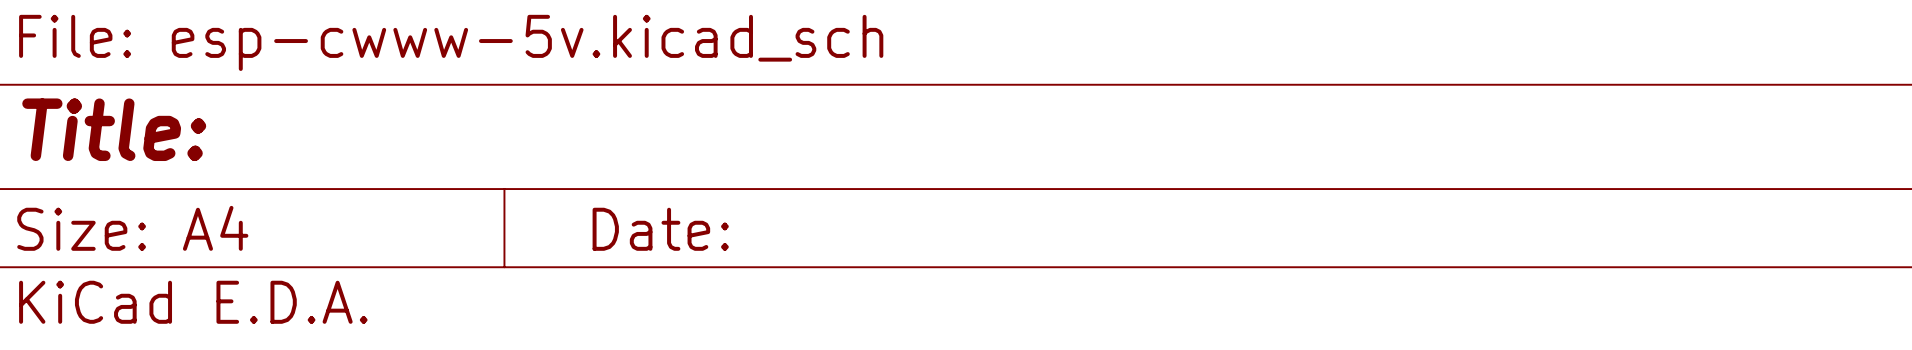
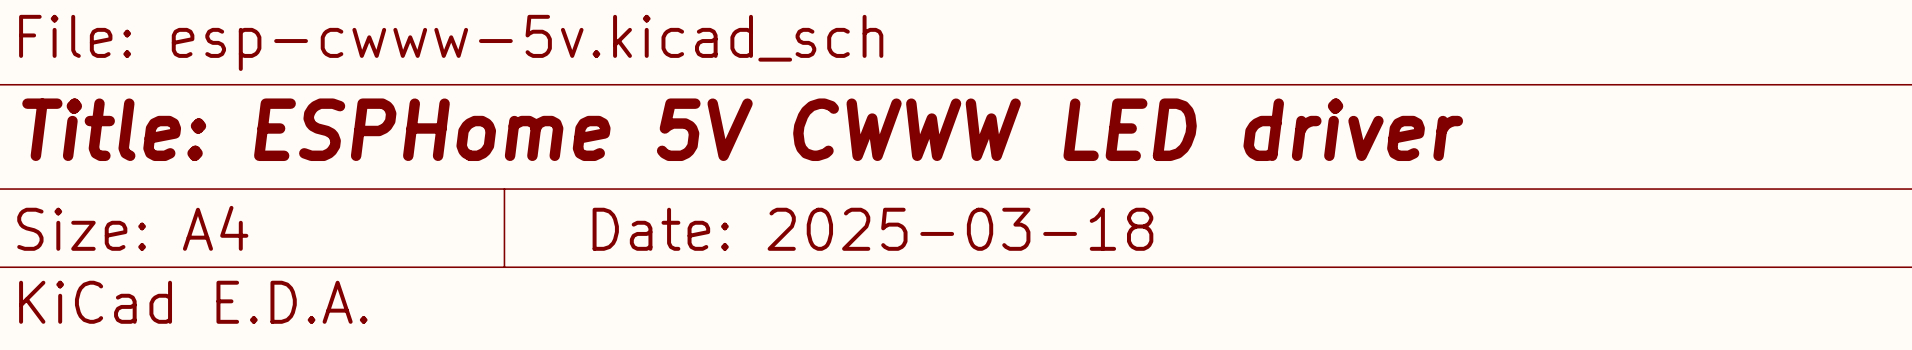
title block: Title: (114, 129) -> Title: ESPHome 5V CWWW LED driver (742, 129)
title block: Date: (660, 229) -> Date: 2025-03-18 (872, 229)

